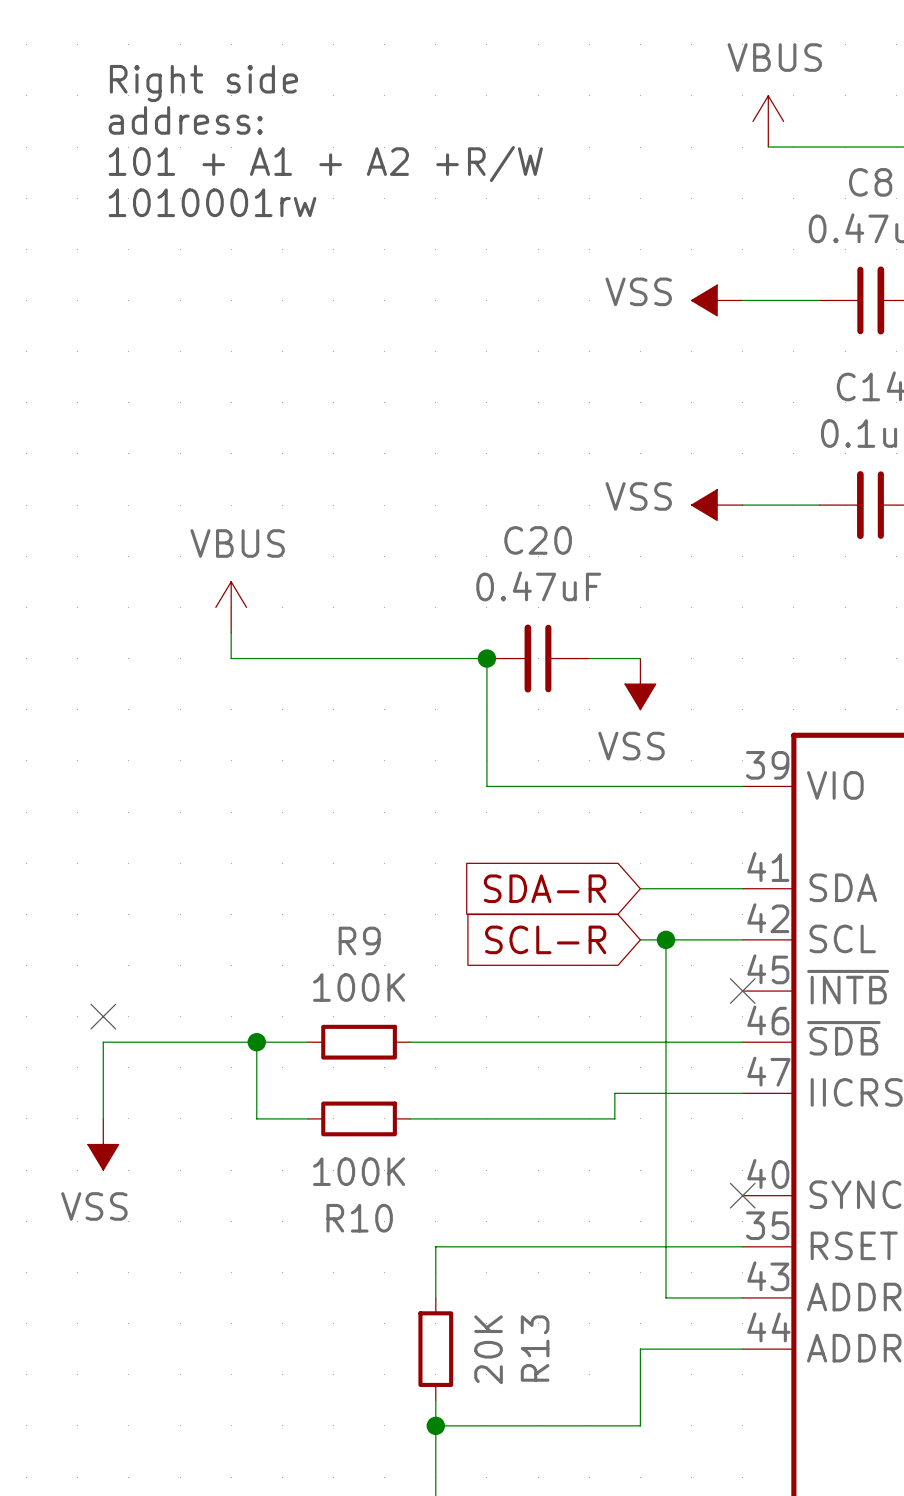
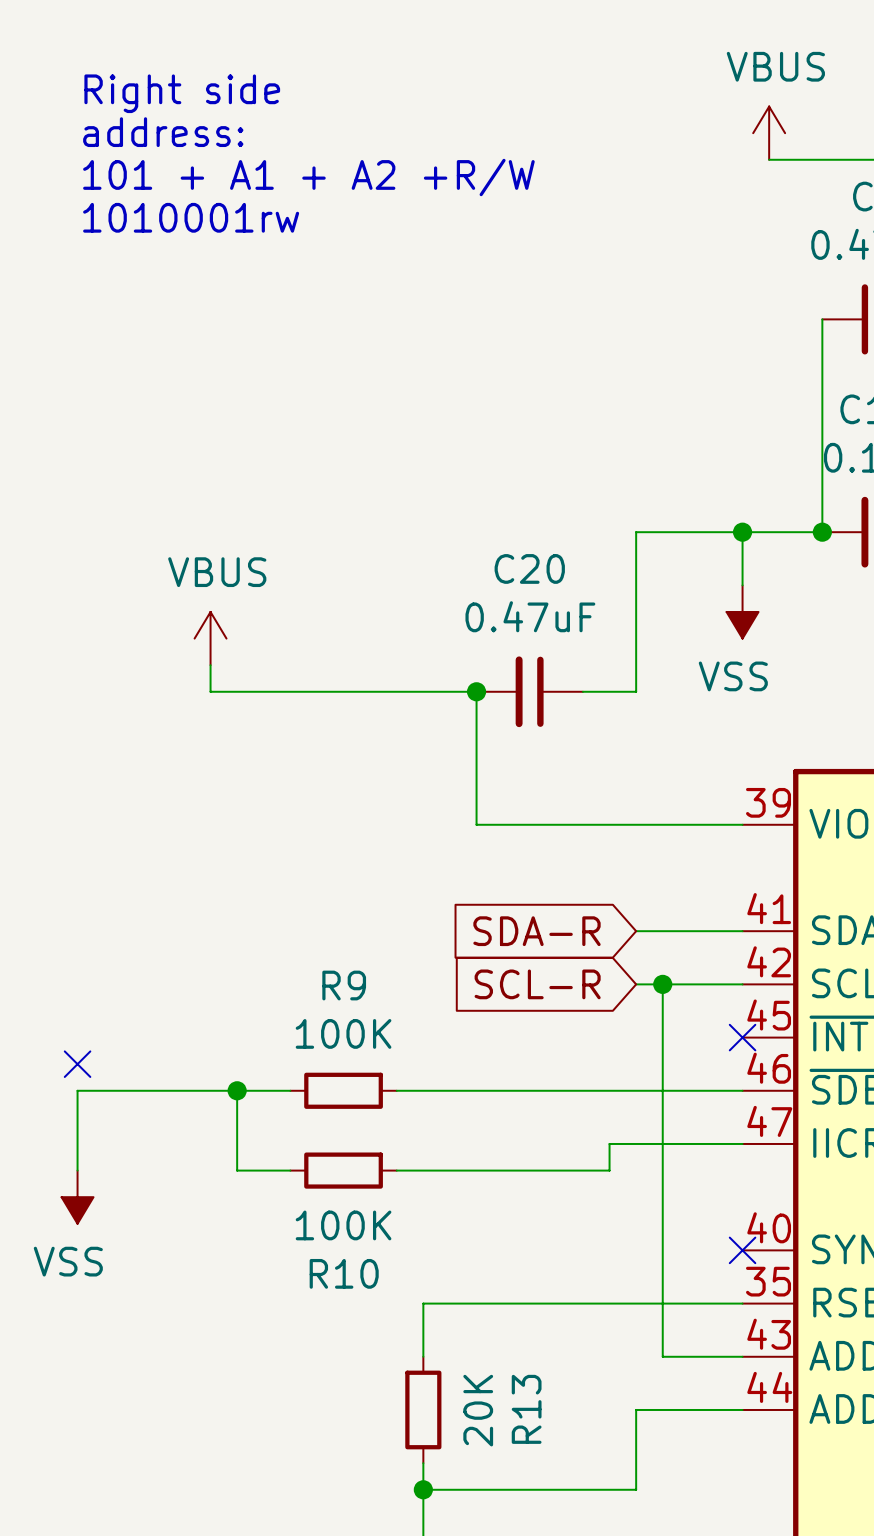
power symbol: VSS (717, 300) -> none
wire: (742, 300) (819, 300) -> (822, 532) (822, 319)
power symbol: VSS (717, 505) -> none
junction: none -> (742, 532)
junction: none -> (822, 532)
wire: none -> (742, 585) (742, 532) (636, 532) (636, 691)
power symbol: none -> VSS (742, 611)
power symbol: VSS (640, 684) -> none

